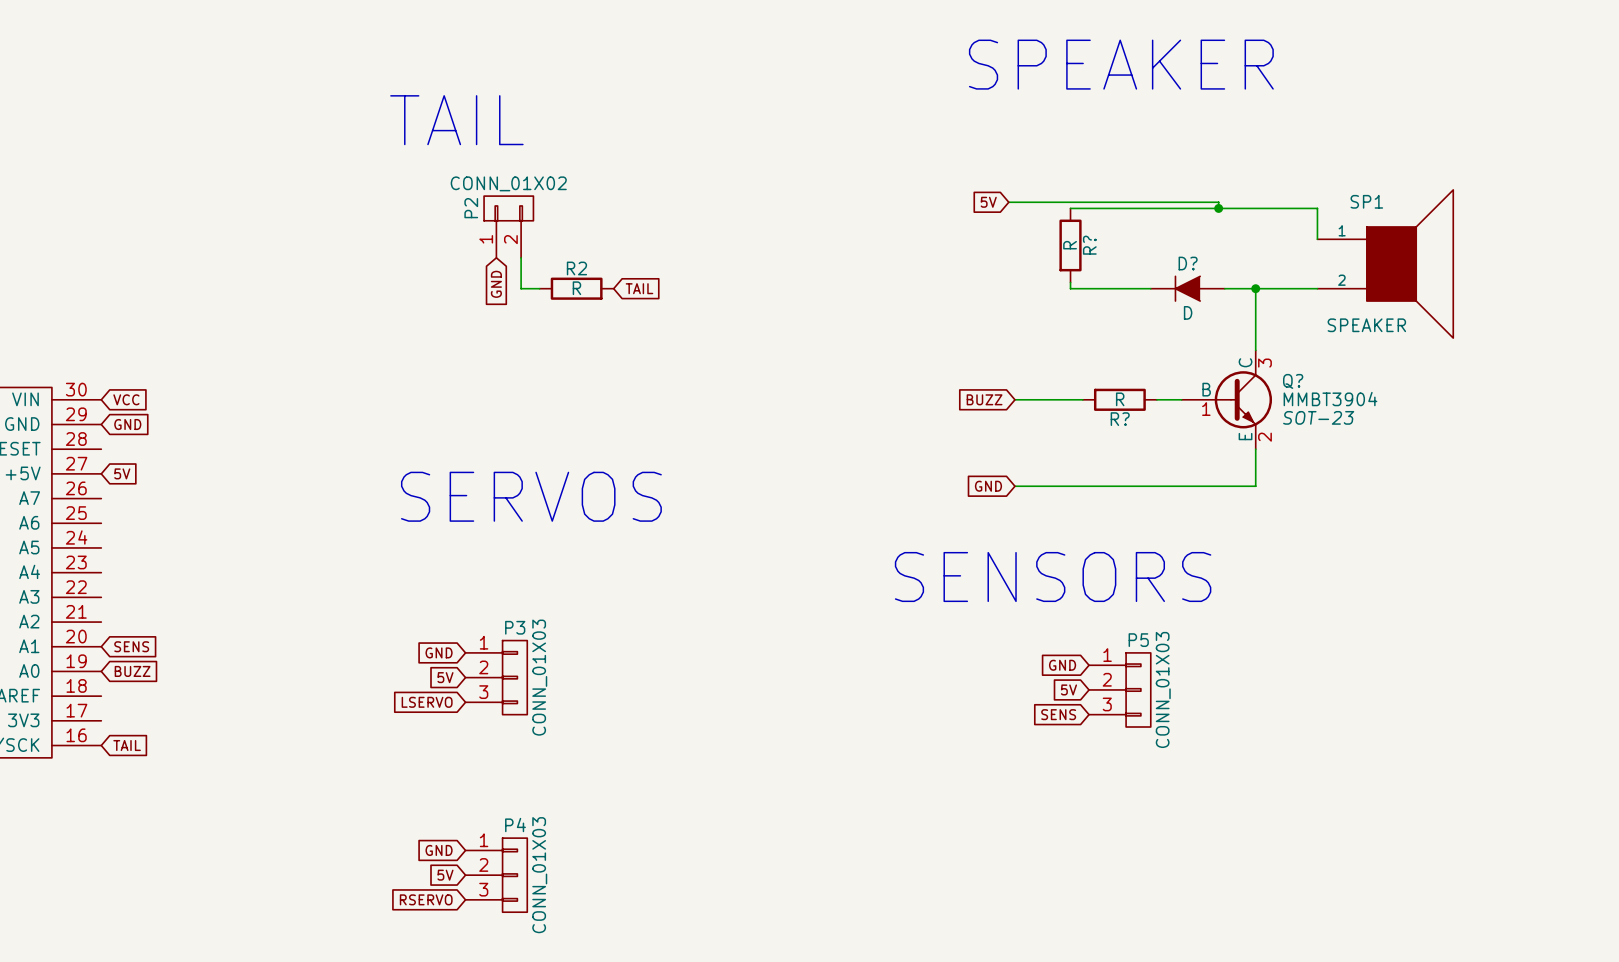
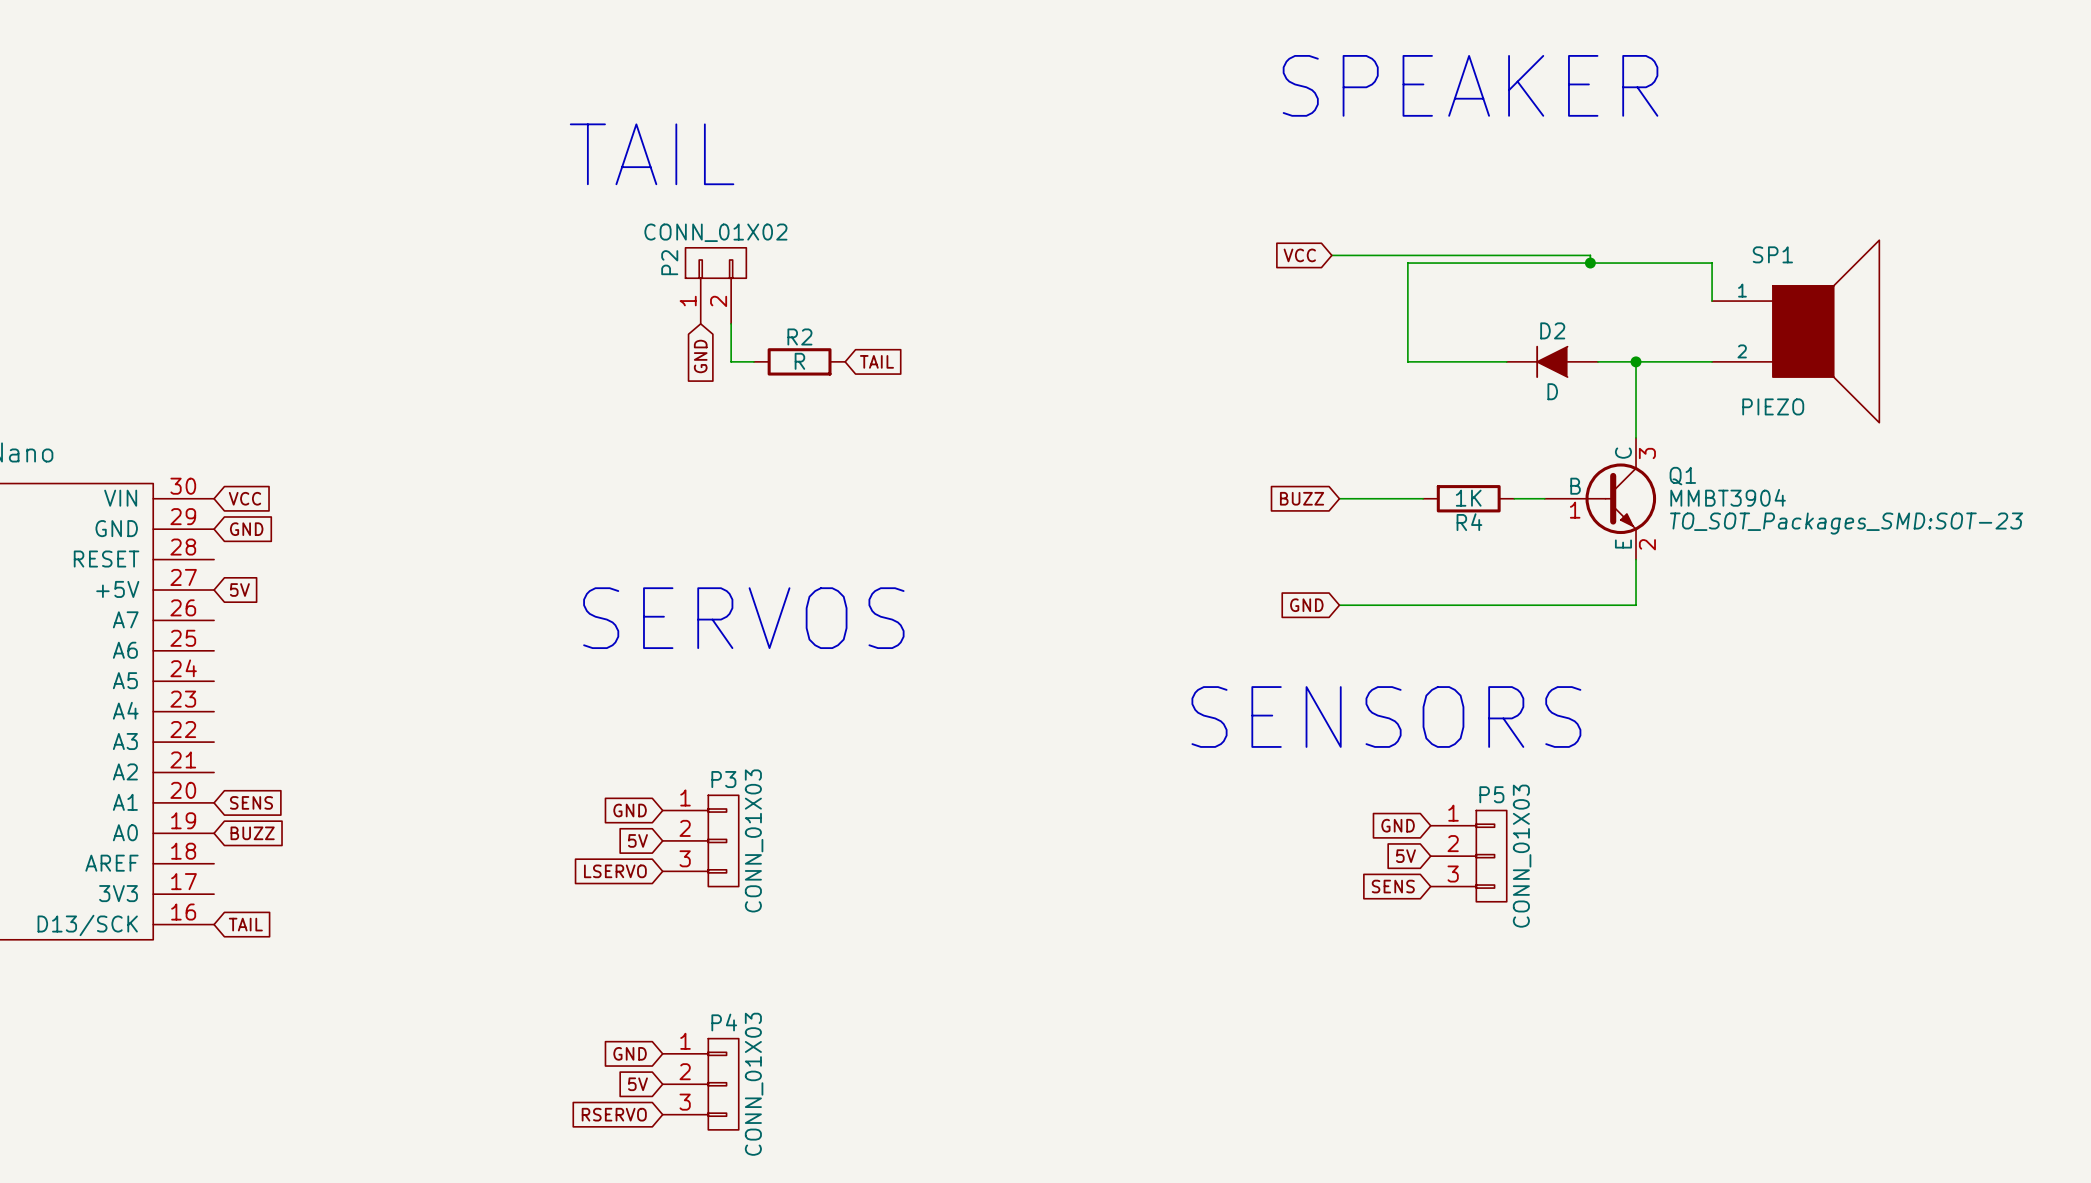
global label: 5V (988, 202) -> VCC (1299, 255)
wire: none -> (1407, 263) (1407, 354)
R?: R (1070, 245) -> none
D? name: D? (1188, 263) -> D2 (1552, 330)
SP1 value: SPEAKER (1366, 325) -> PIEZO (1773, 406)
Q? name: Q? (1293, 381) -> Q1 (1682, 476)
R? value: R (1120, 399) -> 1K (1468, 498)
Q? text: SOT-23 (1318, 417) -> TO_SOT_Packages_SMD:SOT-23 (1846, 523)
R? name: R? (1120, 419) -> R4 (1469, 522)

